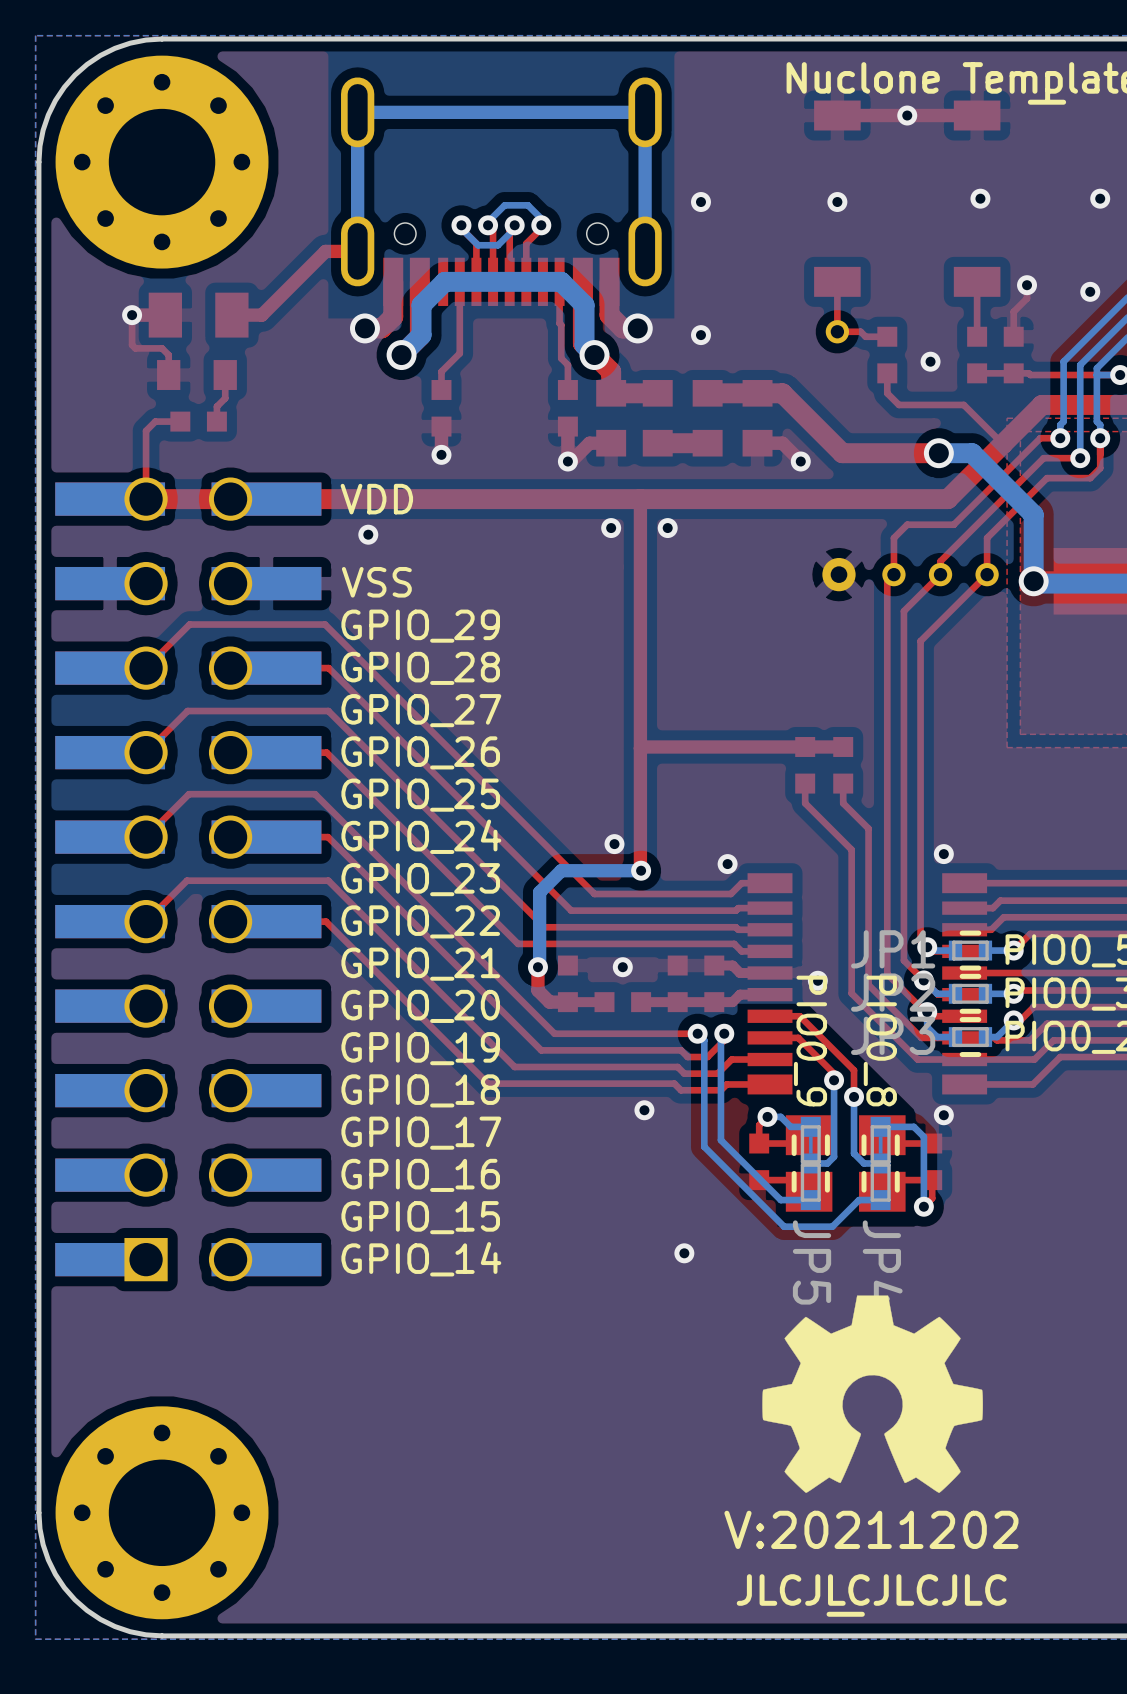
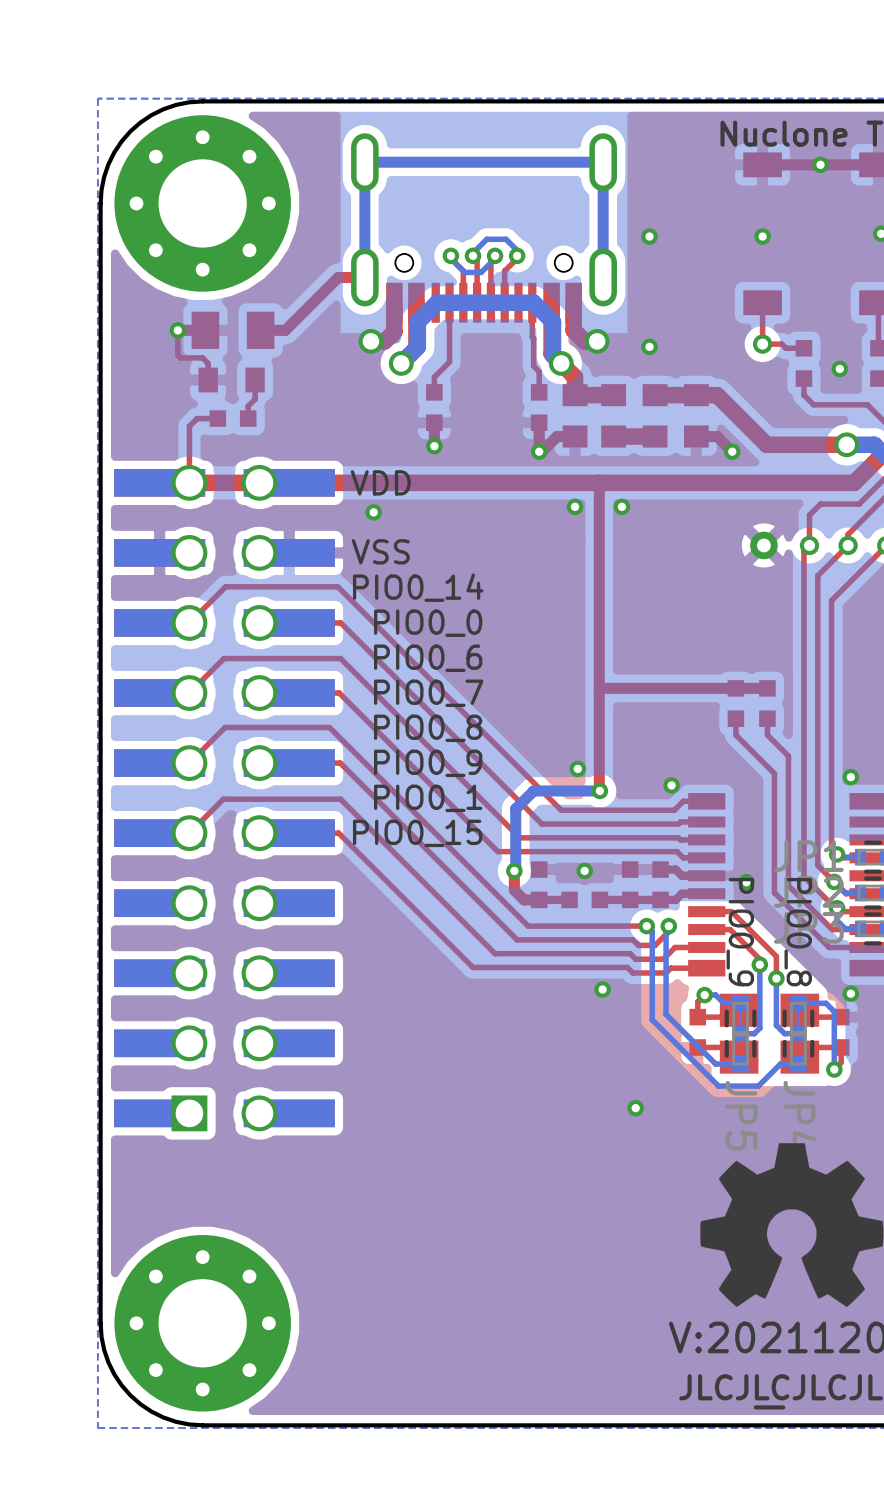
part footprint: [55, 477, 322, 1282] -> [114, 464, 335, 1132]

